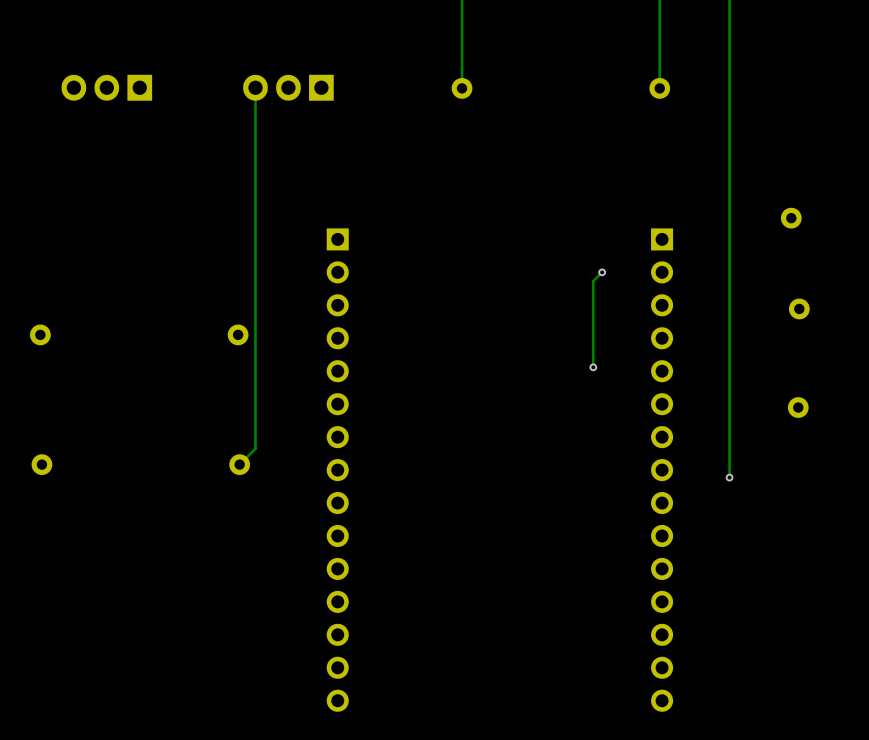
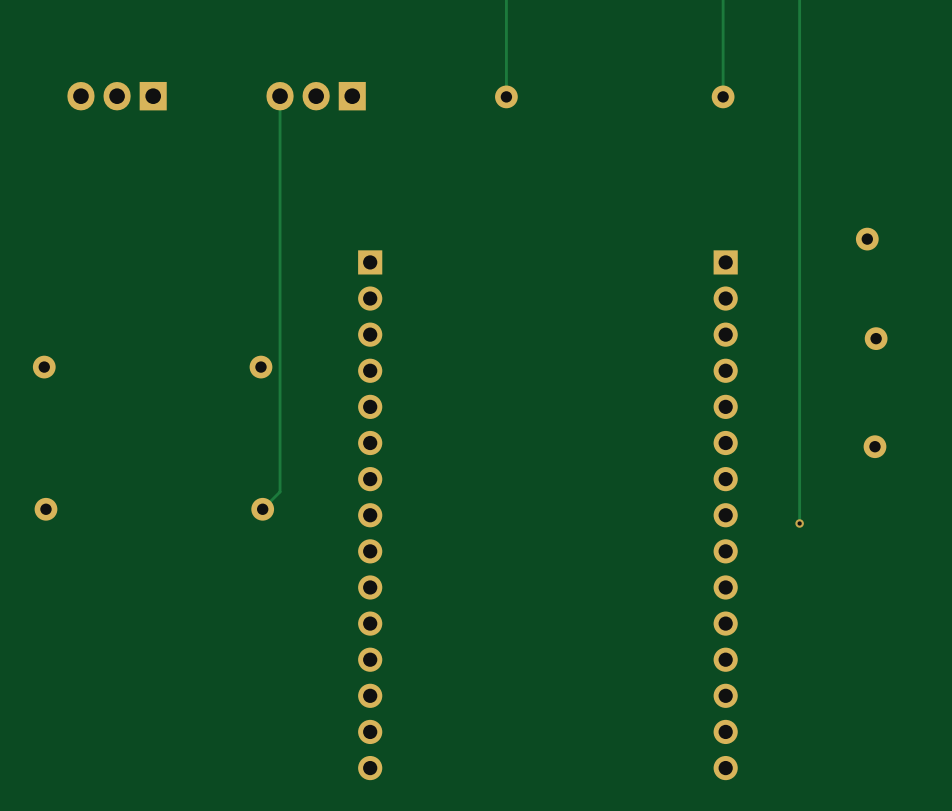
track: (602, 272) (593, 281) (593, 367) -> none
via: (602, 272) -> none
via: (593, 367) -> none

